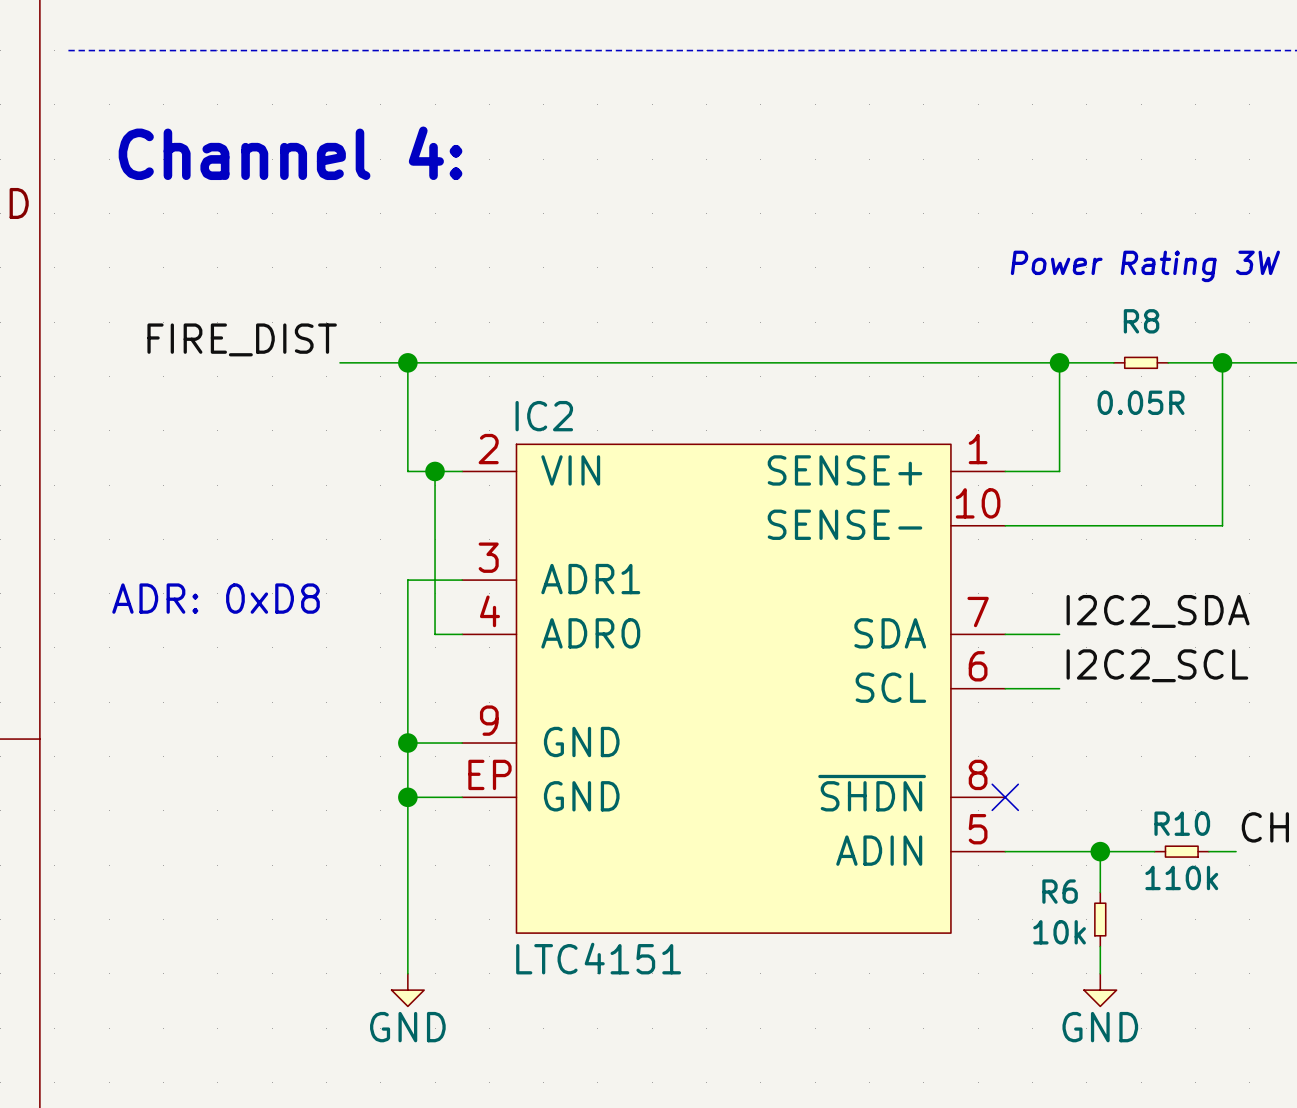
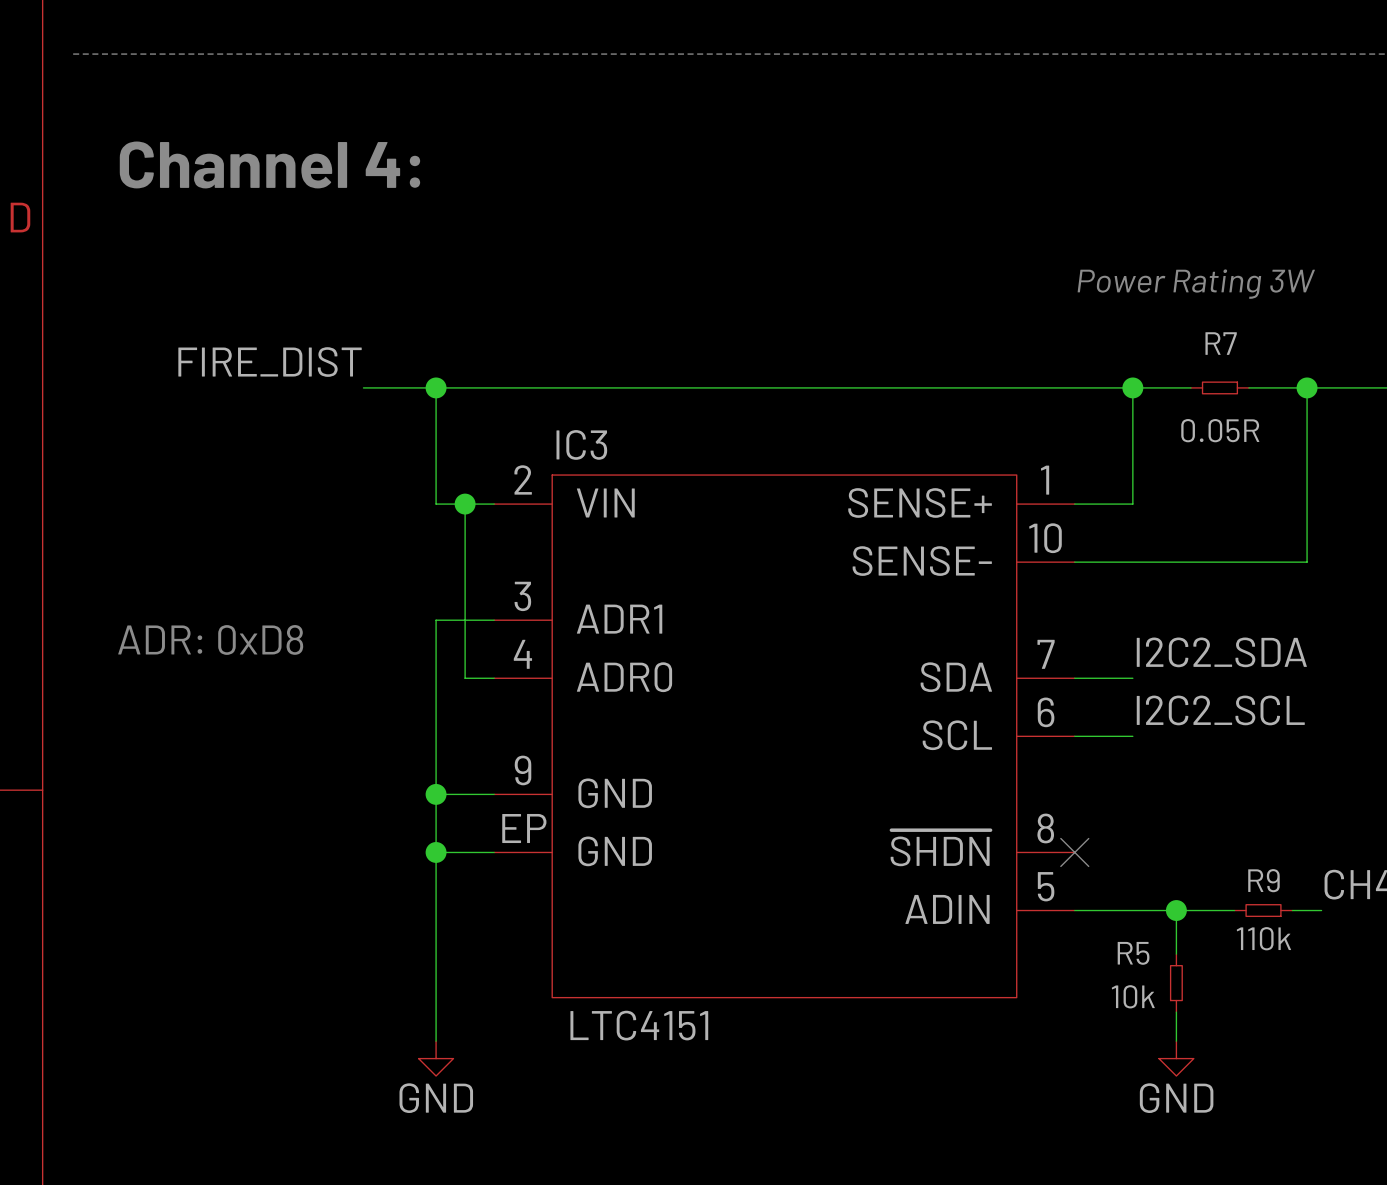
R8 name: R8 (1141, 321) -> R7 (1221, 343)
IC2 name: IC2 (544, 416) -> IC3 (581, 444)
R10 name: R10 (1182, 823) -> R9 (1263, 880)
R6 name: R6 (1060, 891) -> R5 (1133, 953)

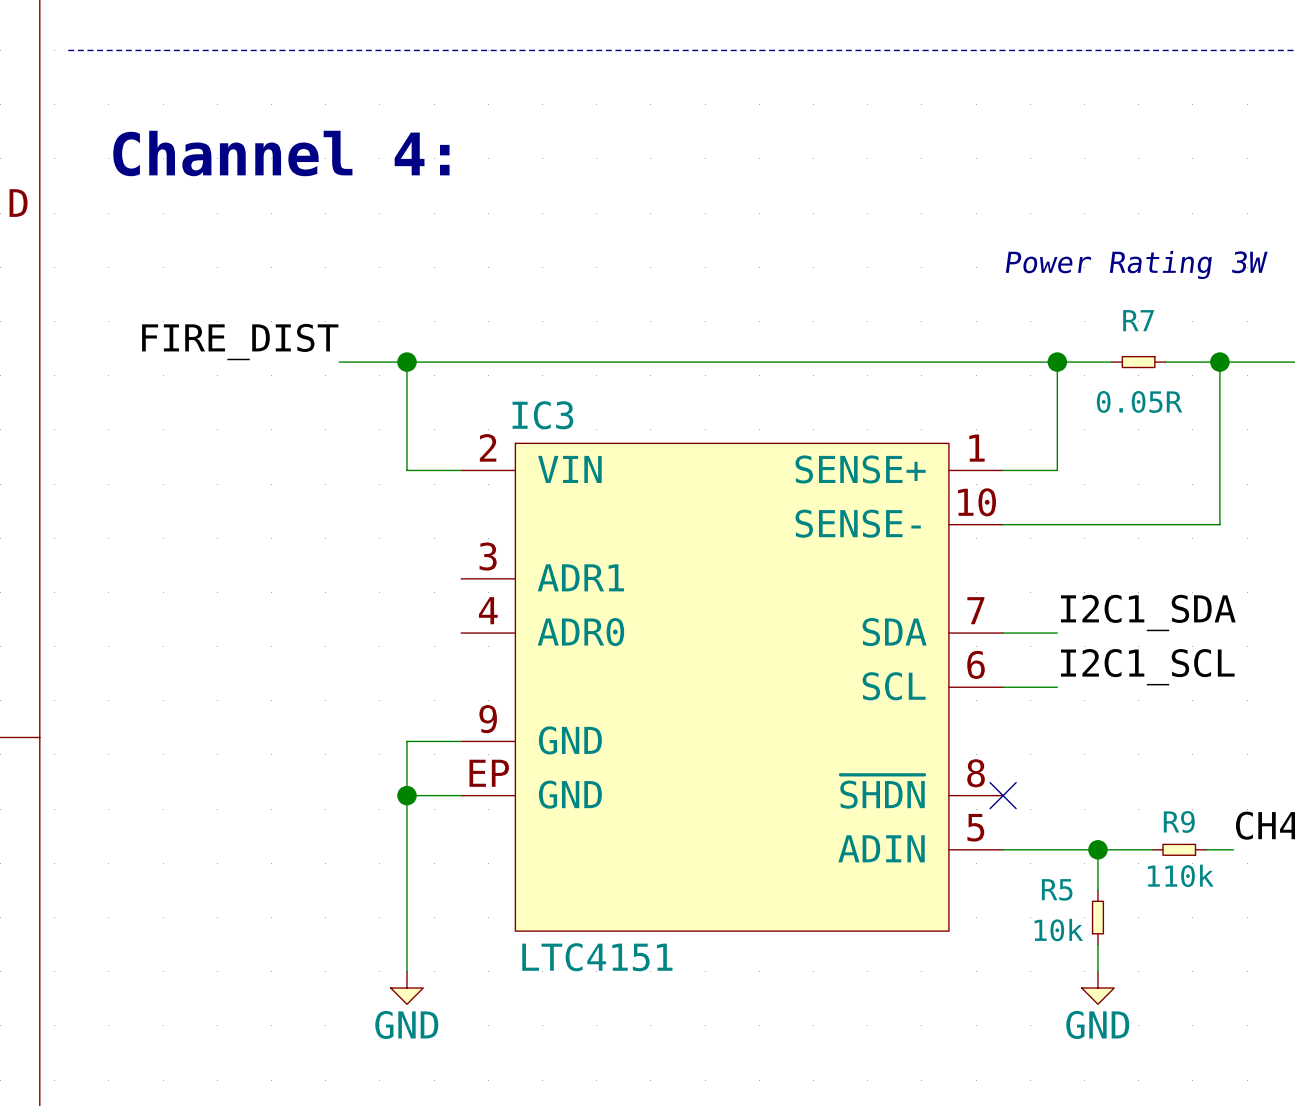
wire: (465, 504) (465, 678) (494, 678) -> none
junction: (465, 504) -> none
wire: (494, 620) (436, 620) (436, 794) -> none
text: ADR: 0xD8 (210, 639) -> none
label: I2C2_SDA (1221, 652) -> I2C1_SDA (1148, 613)
label: I2C2_SCL (1220, 710) -> I2C1_SCL (1147, 667)
junction: (436, 794) -> none

